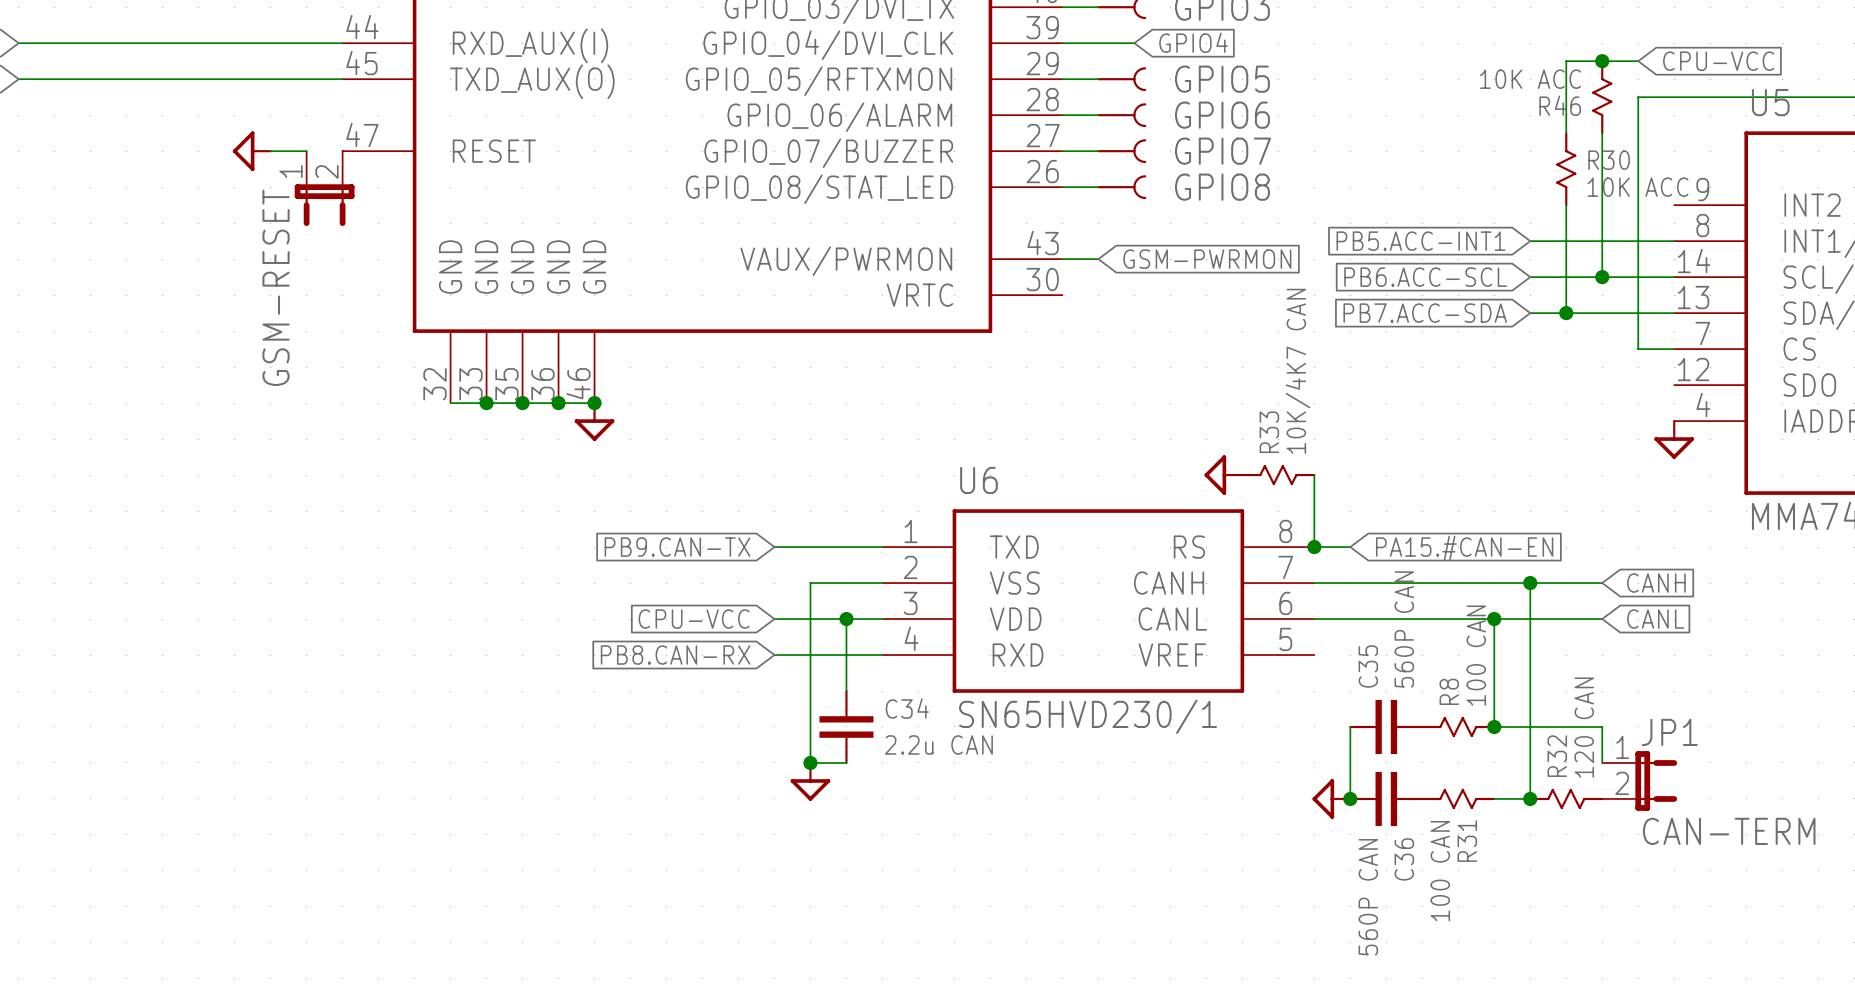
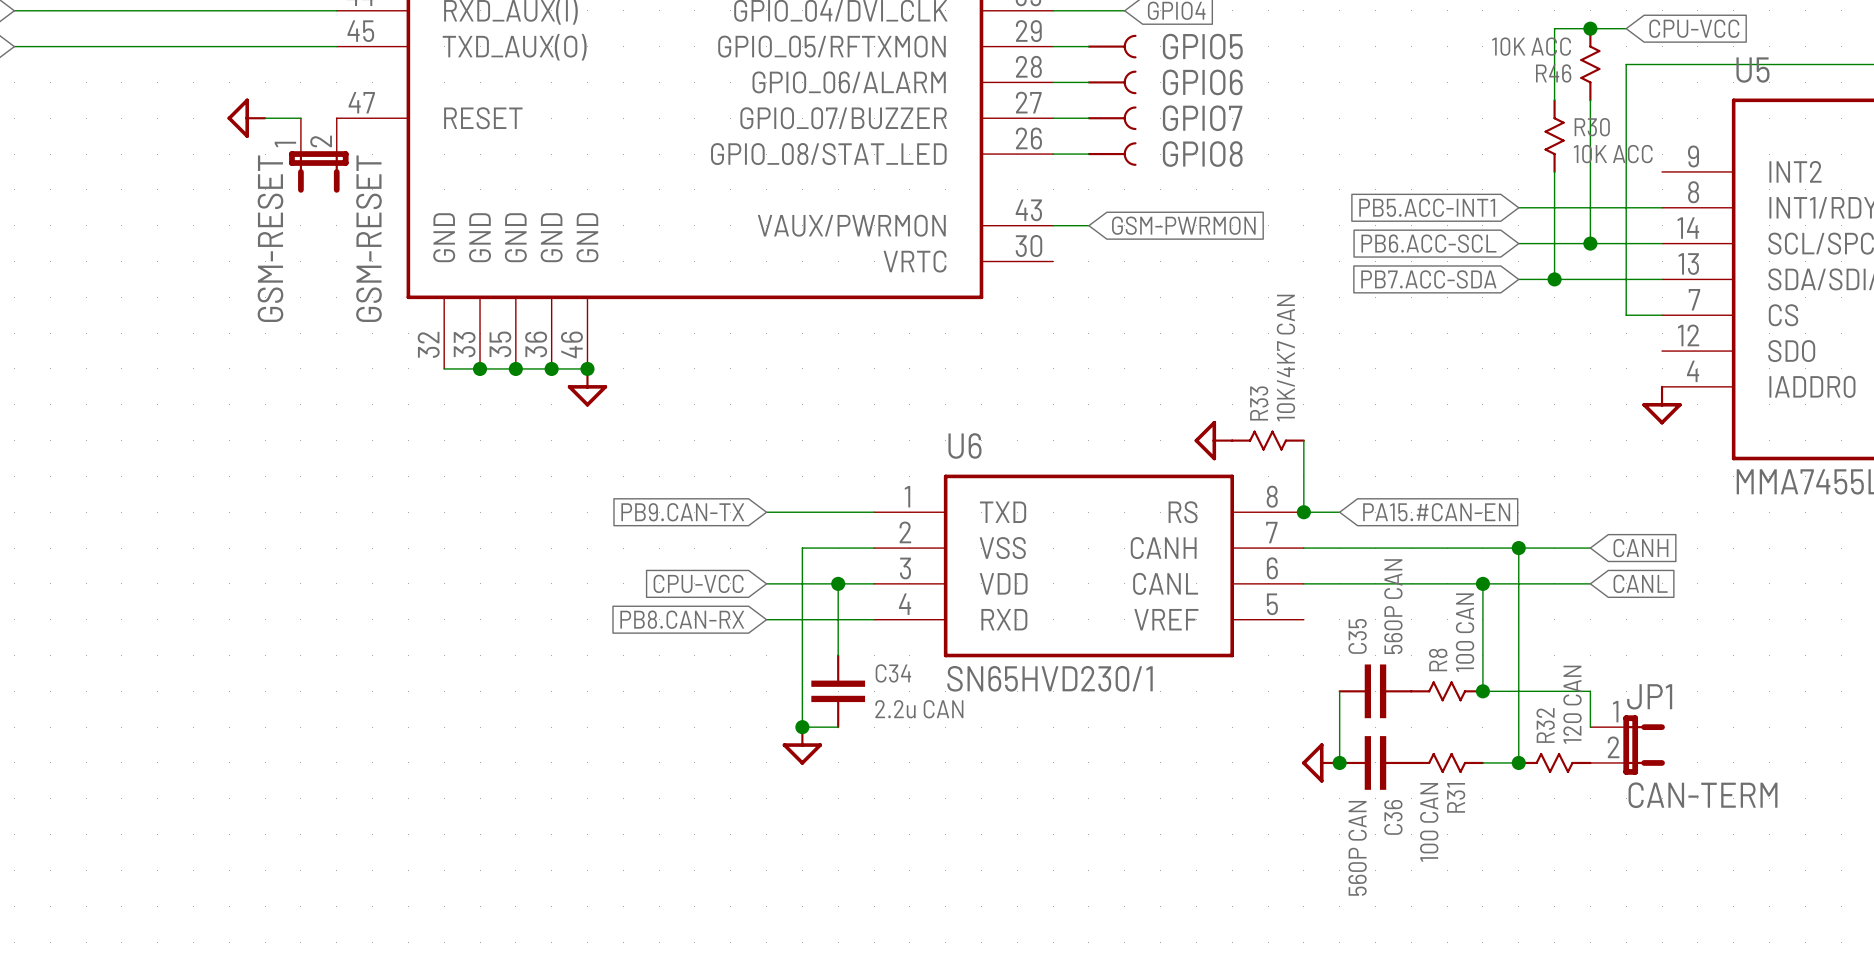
GSM-RESET value: none -> GSM-RESET (368, 238)

